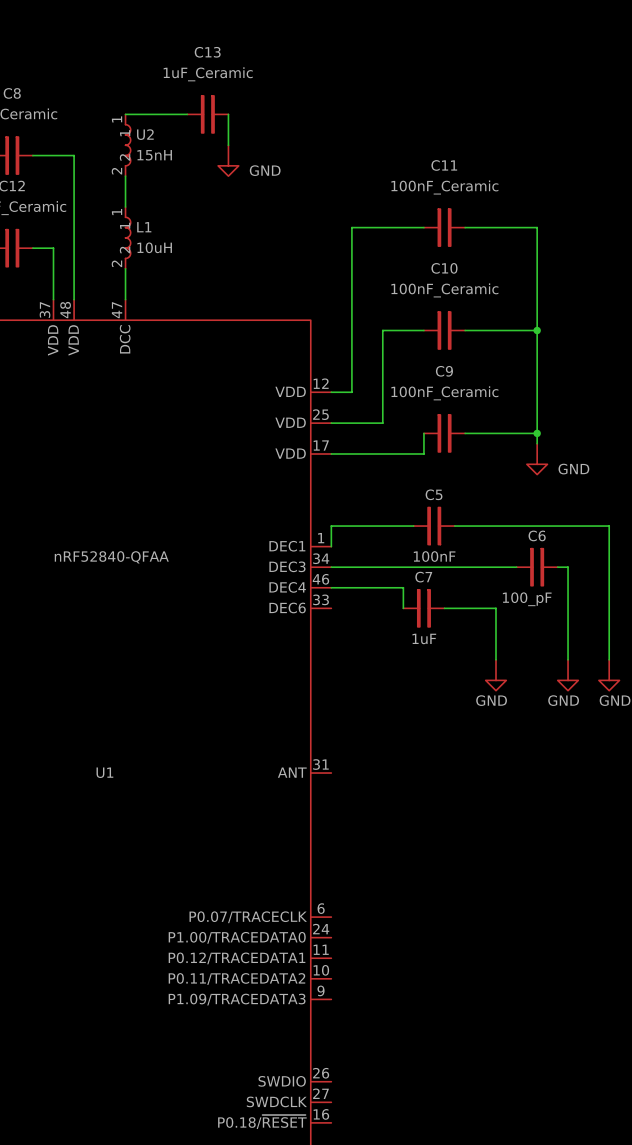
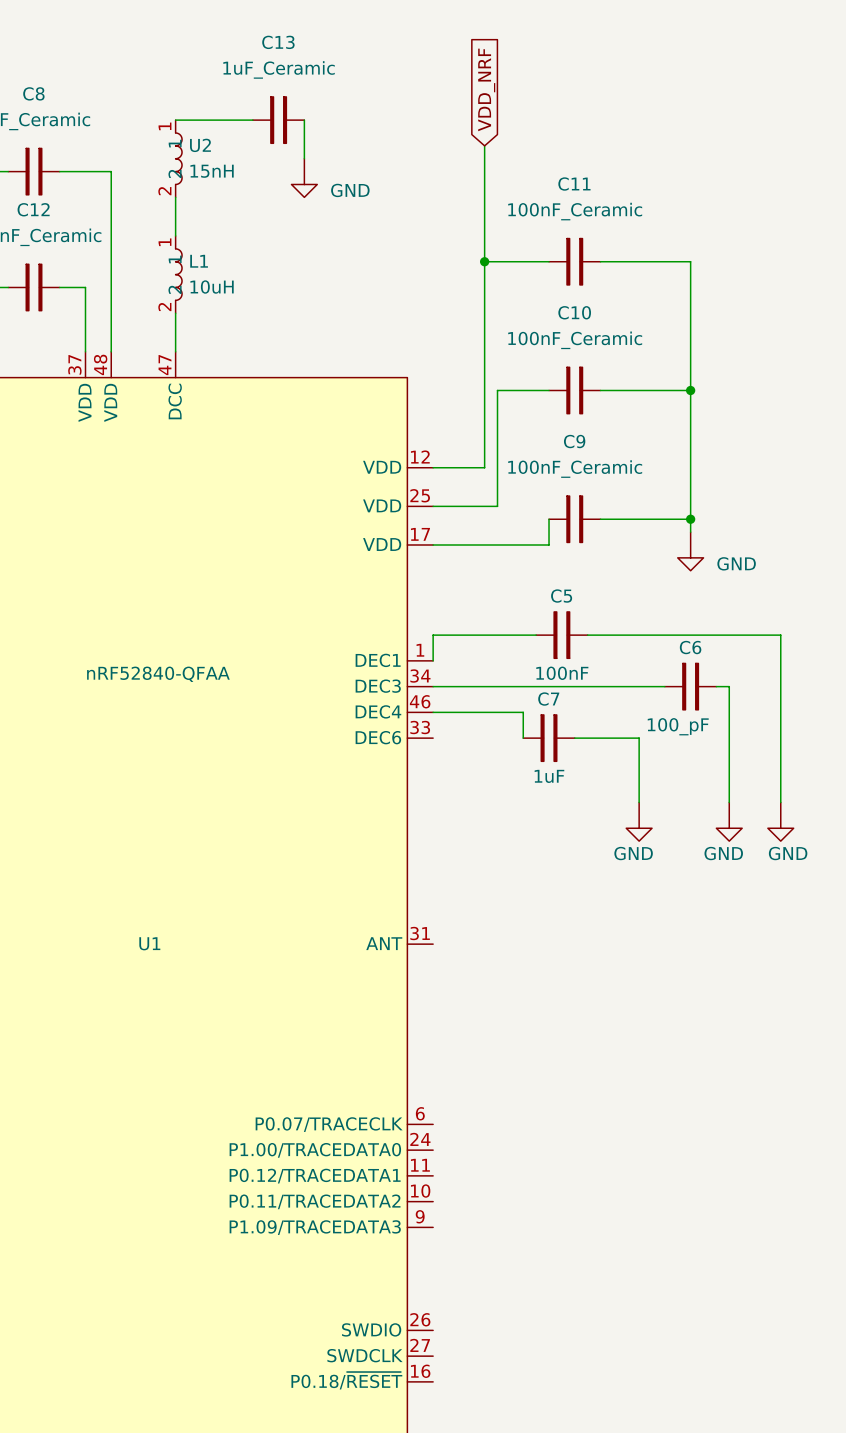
global label: none -> VDD_NRF (486, 89)
wire: (372, 227) (351, 227) (351, 392) -> (484, 145) (484, 467) (458, 467)
junction: none -> (484, 261)

